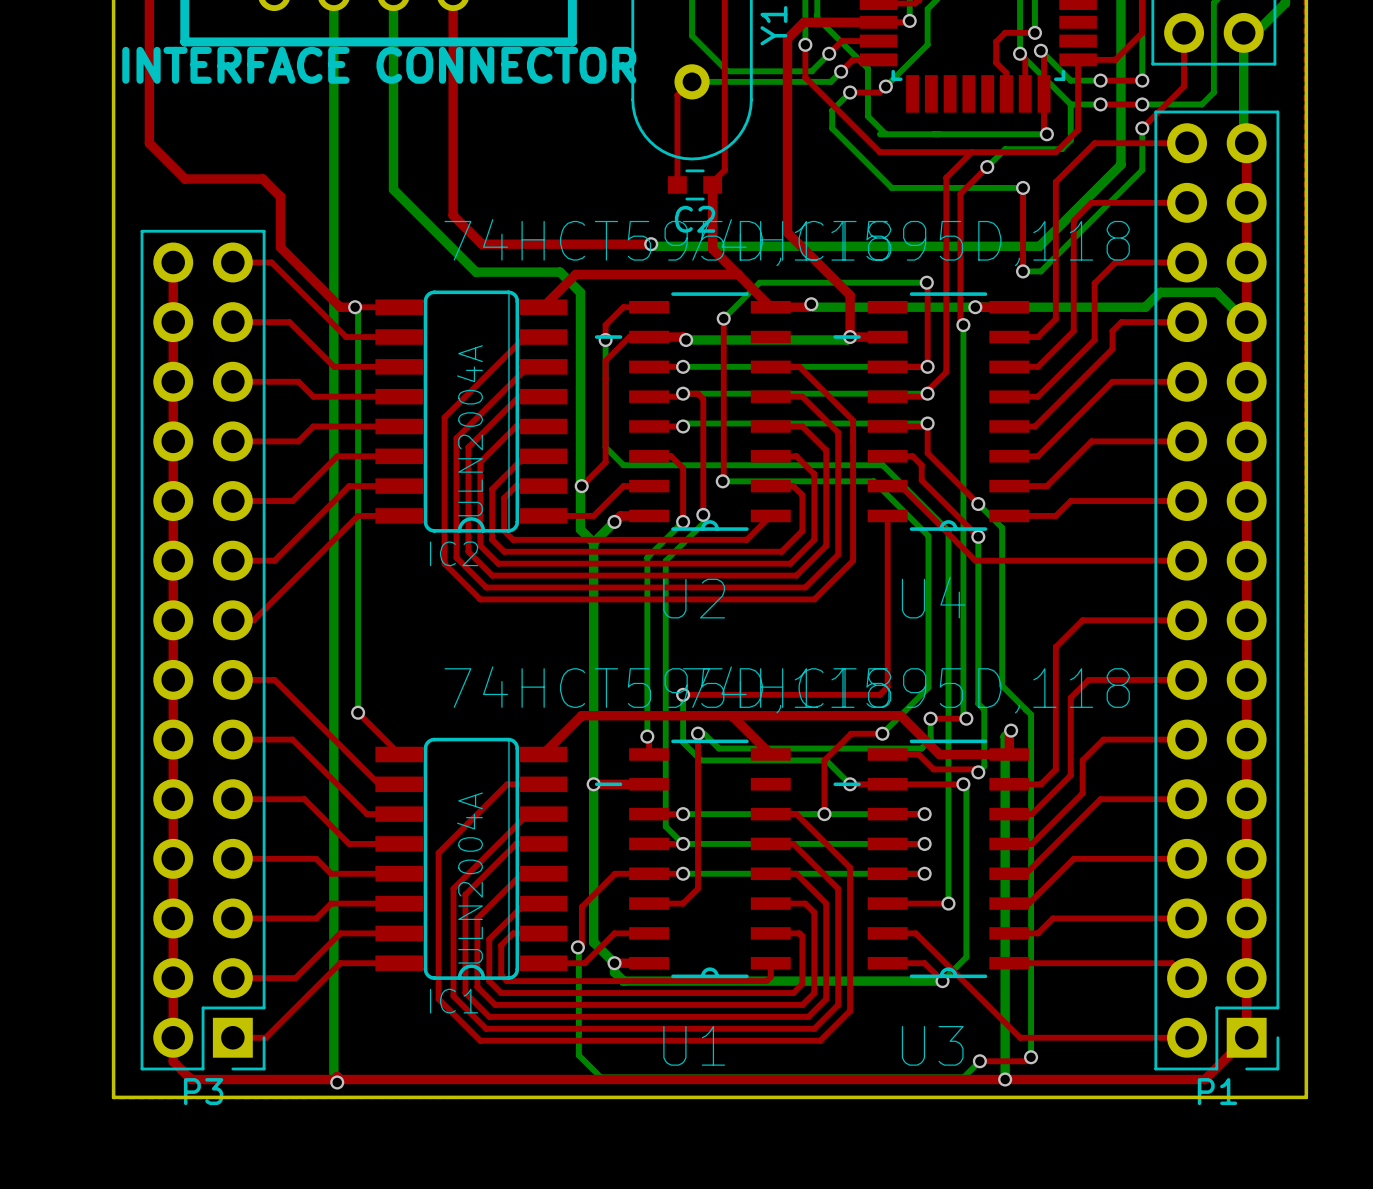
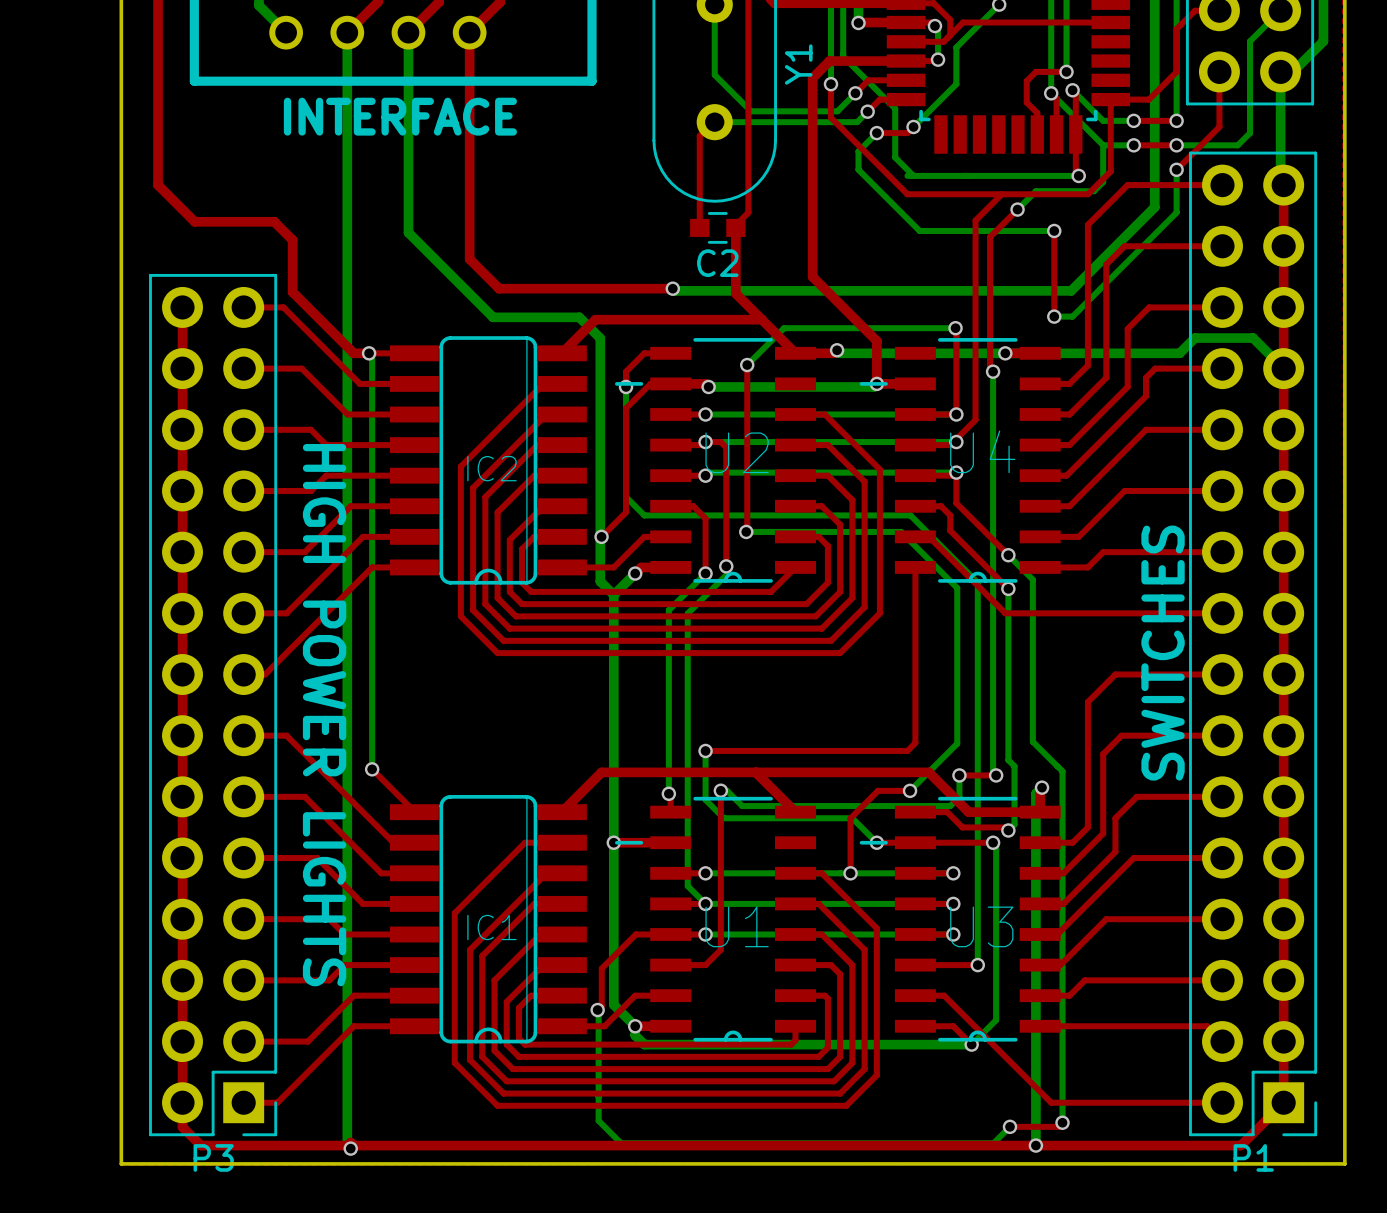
part value: INTERFACE CONNECTOR (379, 65) -> INTERFACE (400, 116)
U2 value: 74HCT595D,118 (667, 242) -> none
U4 value: 74HCT595D,118 (906, 242) -> none
IC2 value: ULN2004A (469, 430) -> none
IC2 name position: IC2 (454, 553) -> IC2 (492, 468)
U4 name position: U4 (933, 597) -> U4 (982, 451)
U2 name position: U2 (694, 598) -> U2 (737, 452)
text: none -> SWITCHES (1163, 653)
text: none -> HIGH POWER LIGHTS (324, 715)
U1 value: 74HCT595D,118 (667, 689) -> none
U3 value: 74HCT595D,118 (906, 689) -> none
IC1 value: ULN2004A (469, 878) -> none
IC1 name position: IC1 (454, 1001) -> IC1 (492, 927)
U1 name position: U1 (694, 1045) -> U1 (737, 926)
U3 name position: U3 (932, 1045) -> U3 (981, 926)

